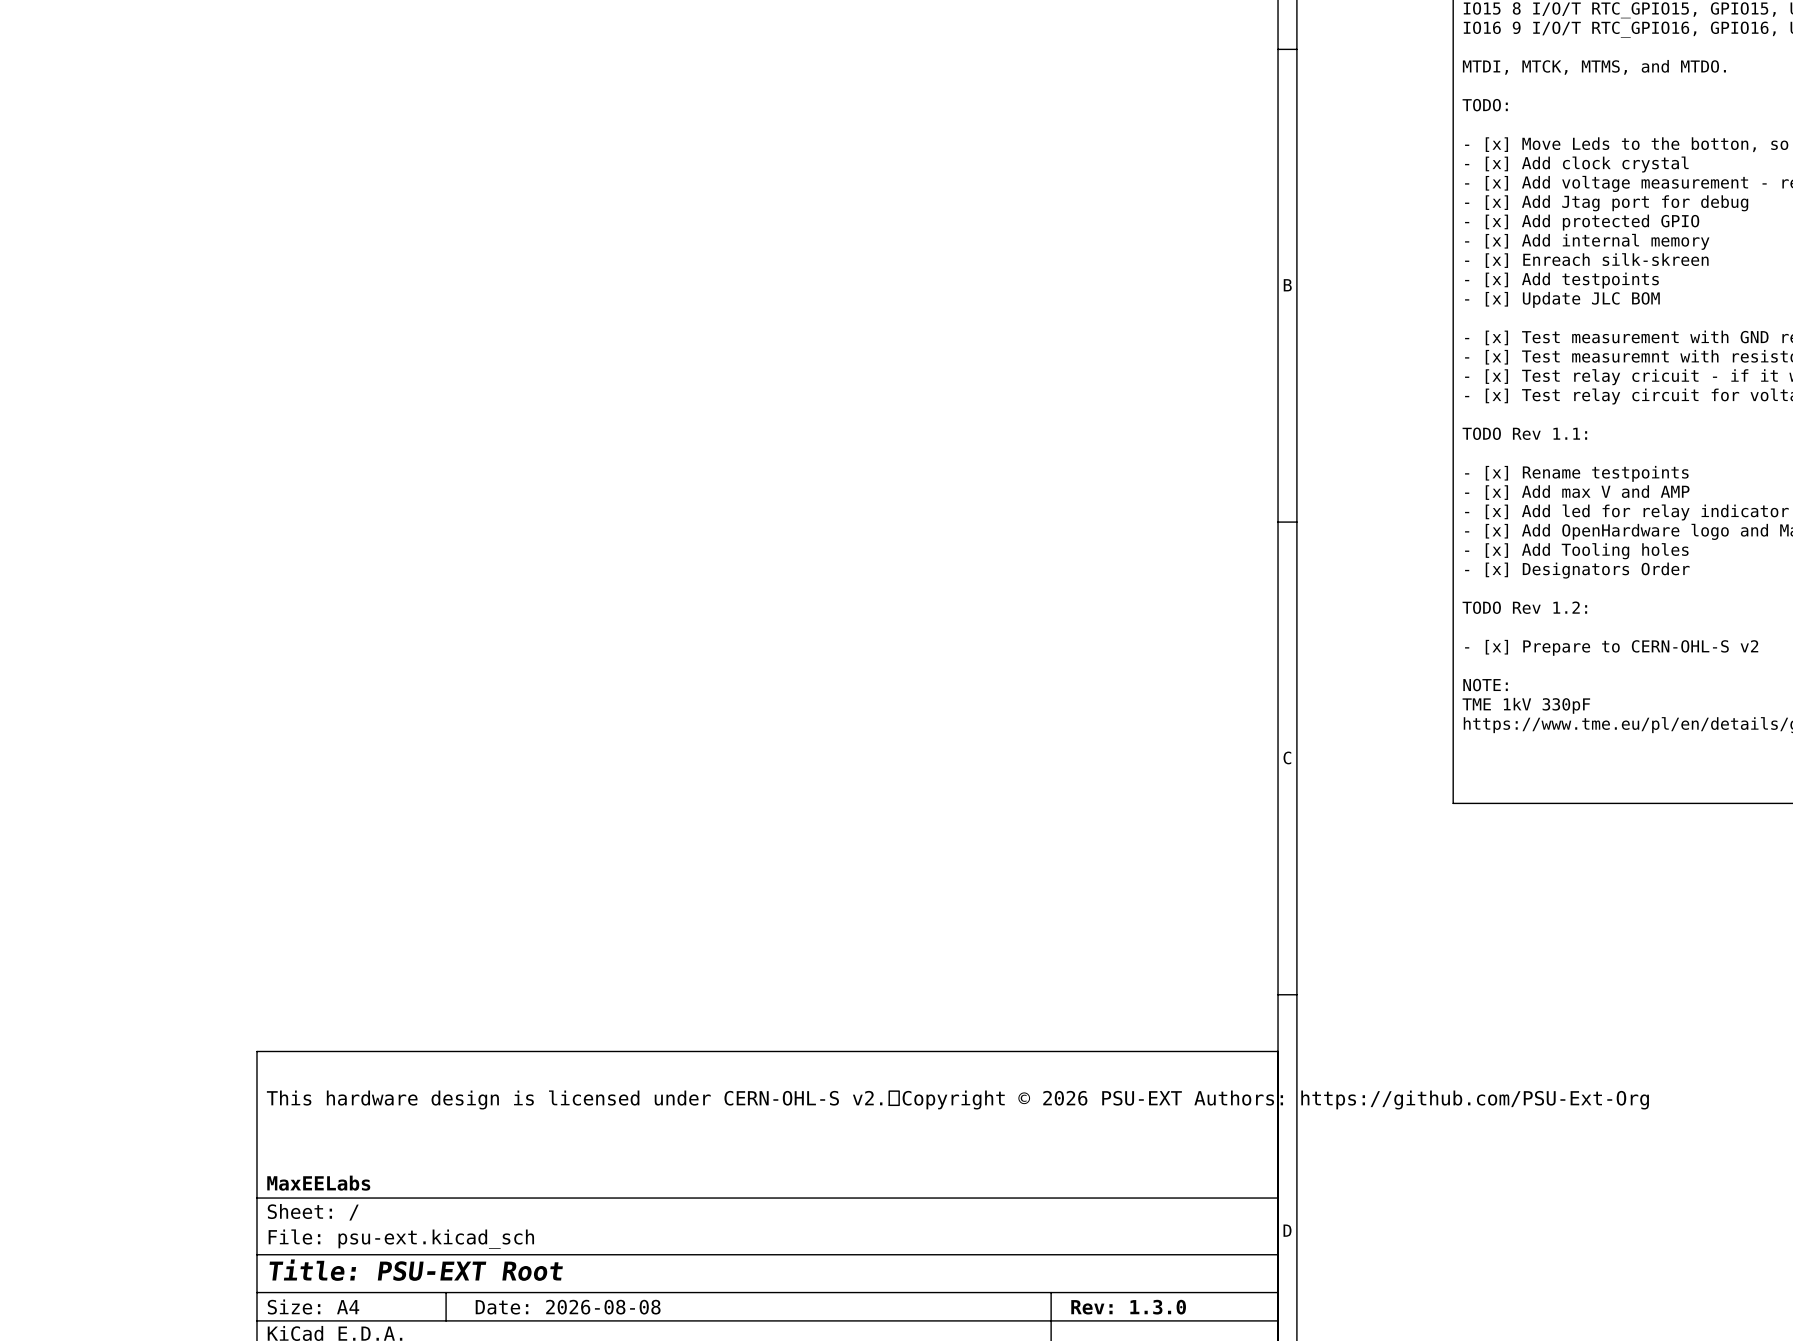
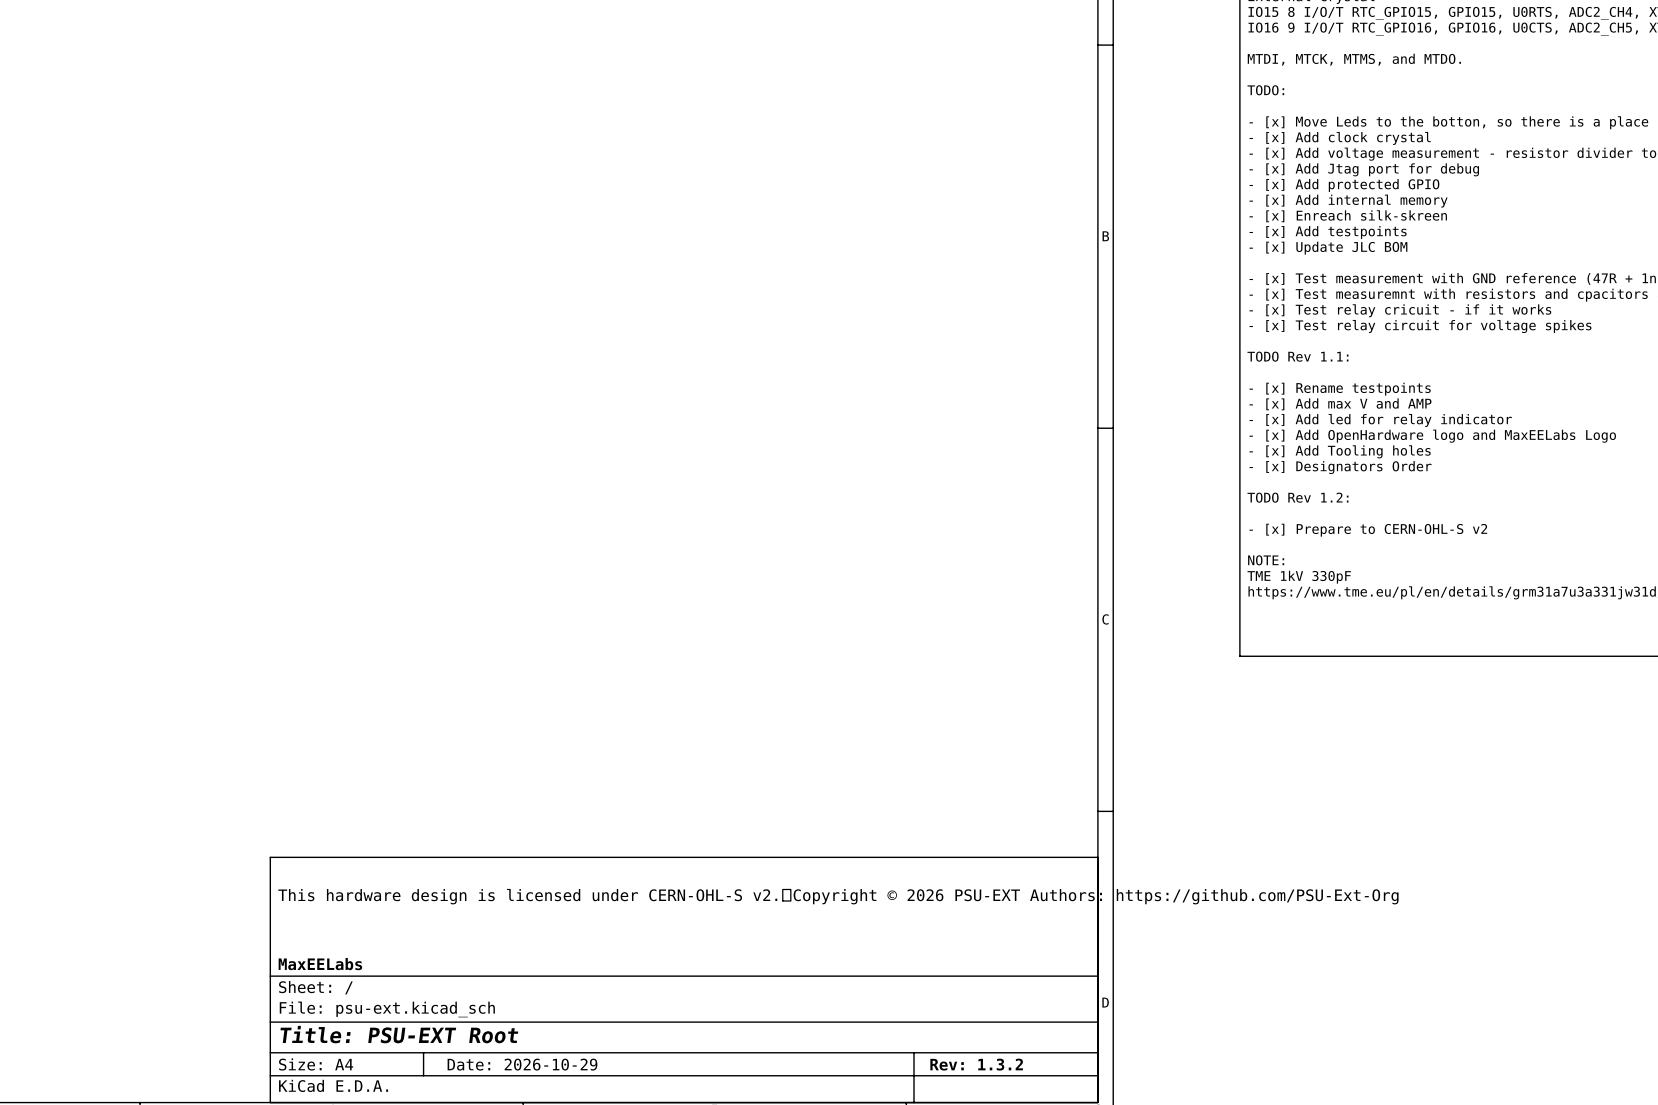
title block: Date: 2026-08-08 (568, 1307) -> Date: 2026-10-29 (522, 1064)
title block: Rev: 1.3.0 (1128, 1307) -> Rev: 1.3.2 (976, 1064)

